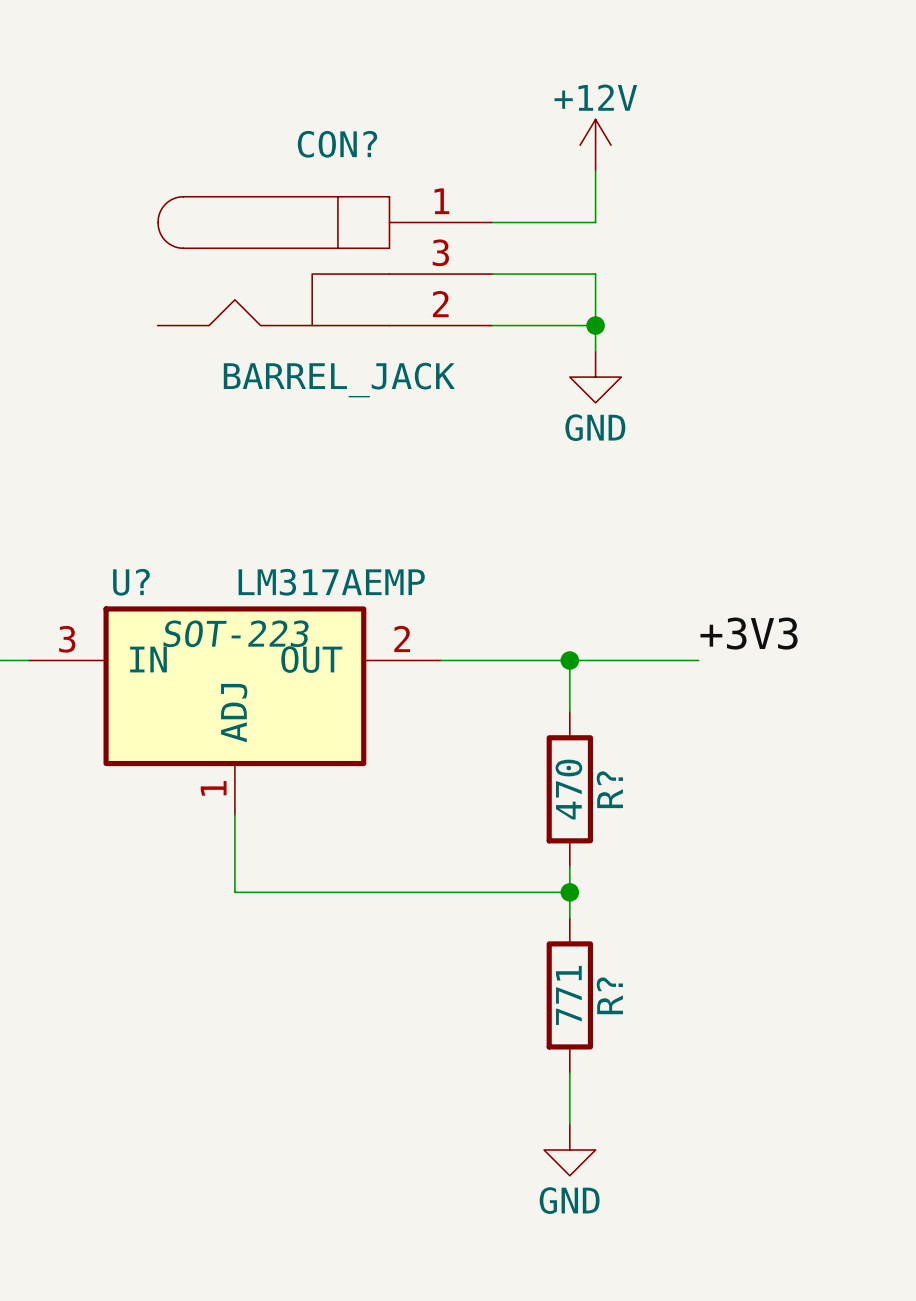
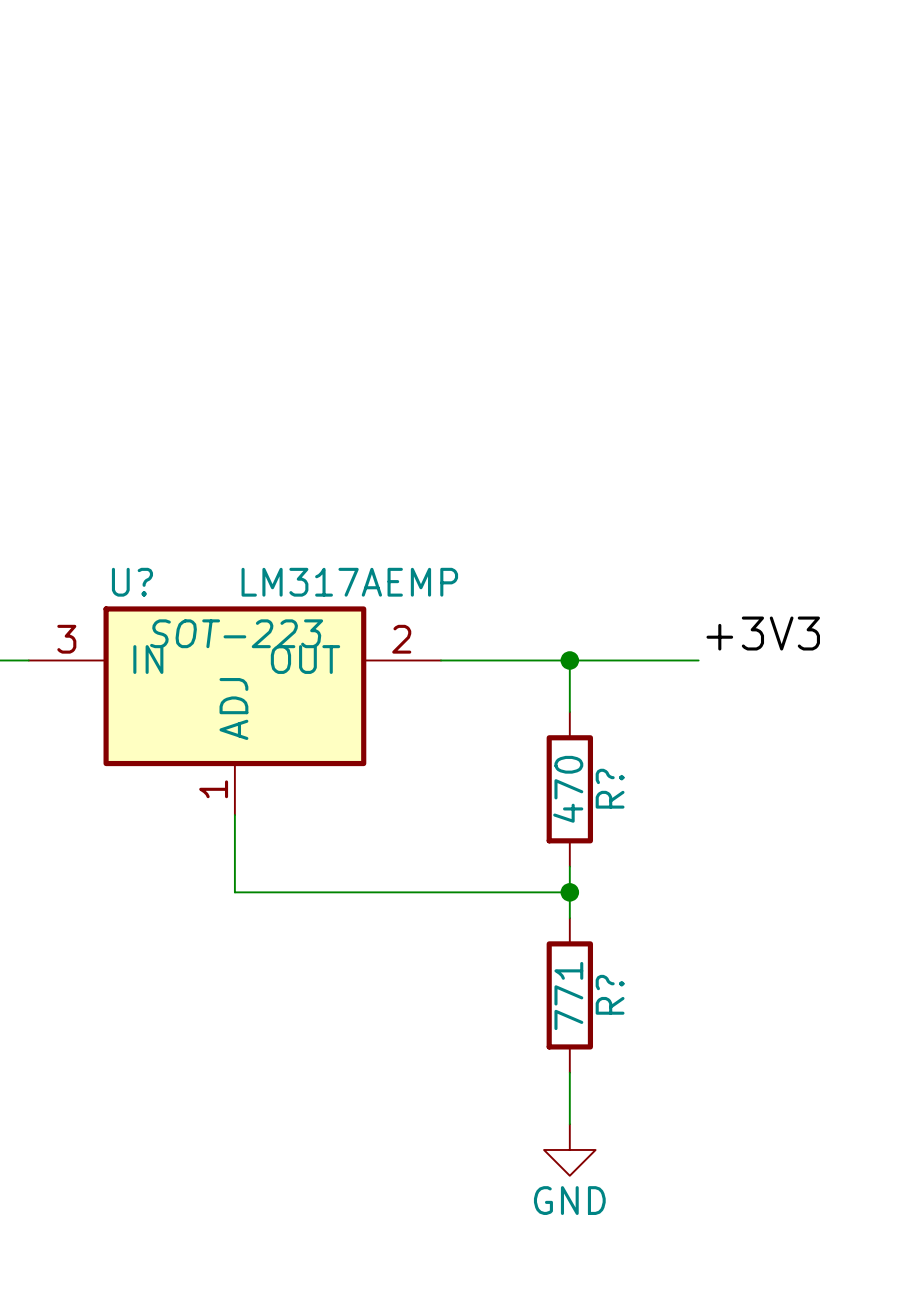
power symbol: +12V (595, 145) -> none
wire: (595, 170) (595, 222) (492, 222) -> none
CON?: BARREL_JACK (325, 261) -> none
wire: (492, 274) (595, 274) (595, 351) -> none
wire: (492, 325) (595, 325) -> none
junction: (595, 325) -> none
power symbol: GND (595, 377) -> none

